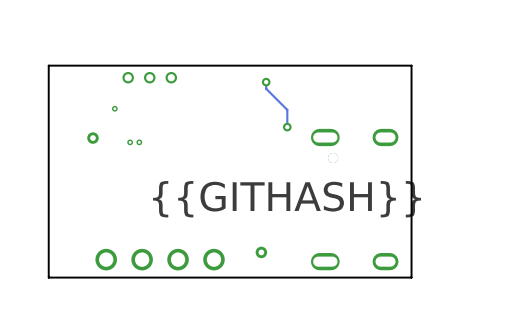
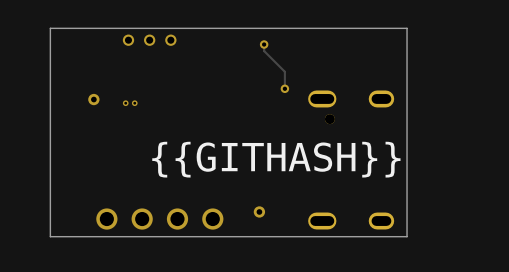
via: (114, 108) -> none
via: none -> (125, 103)
via: none -> (134, 103)
via: (130, 142) -> none
via: (139, 142) -> none

